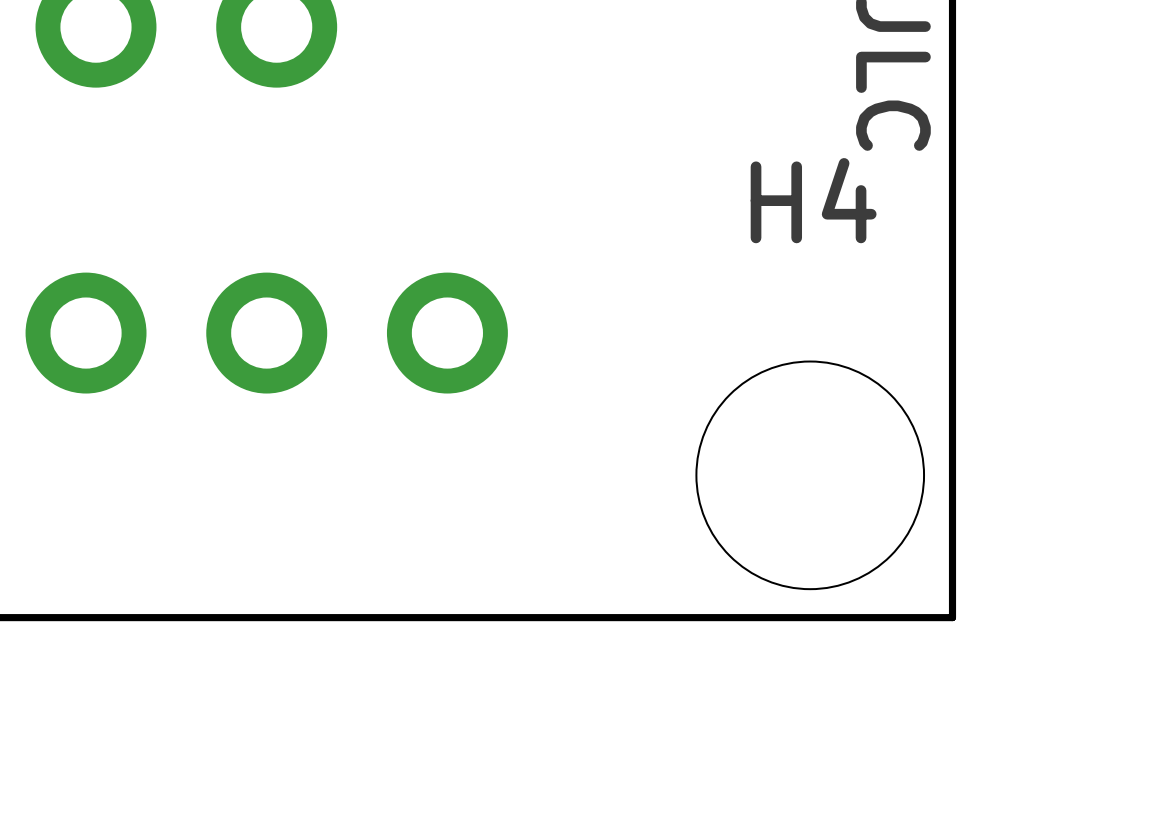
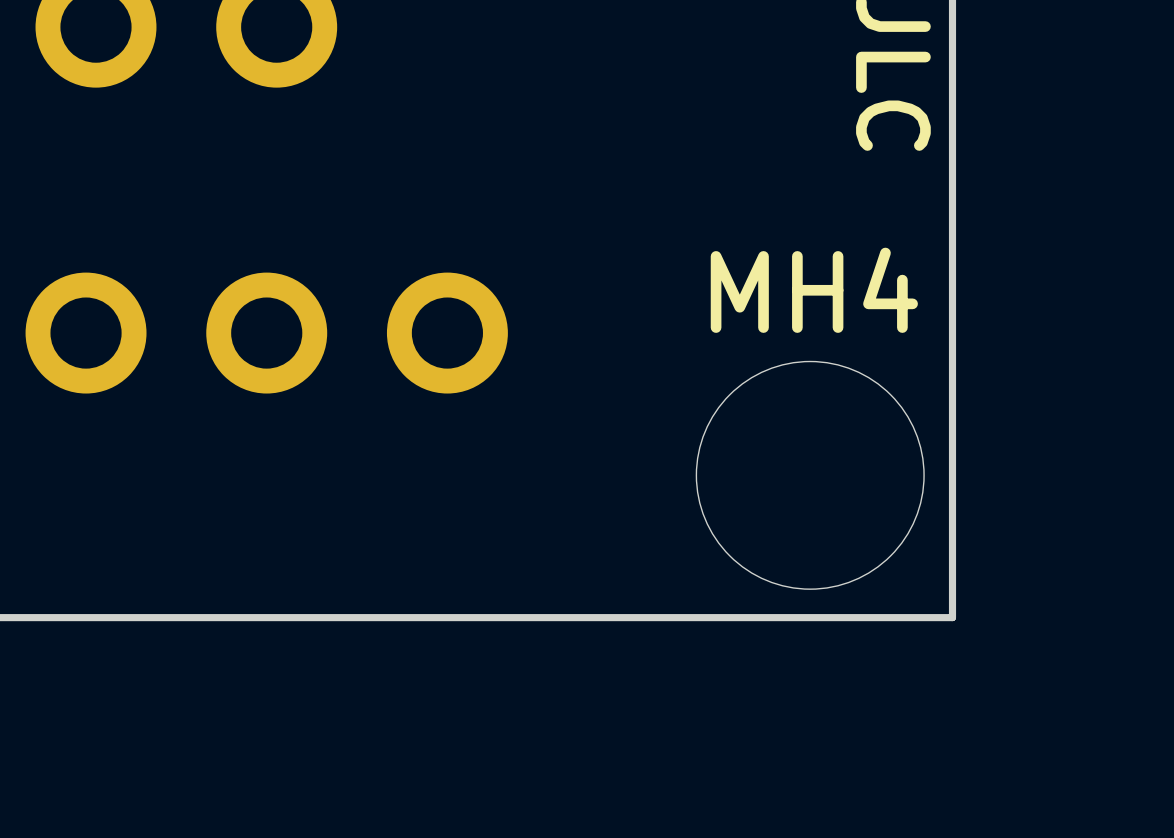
H4 name: H4 (813, 200) -> MH4 (814, 290)

